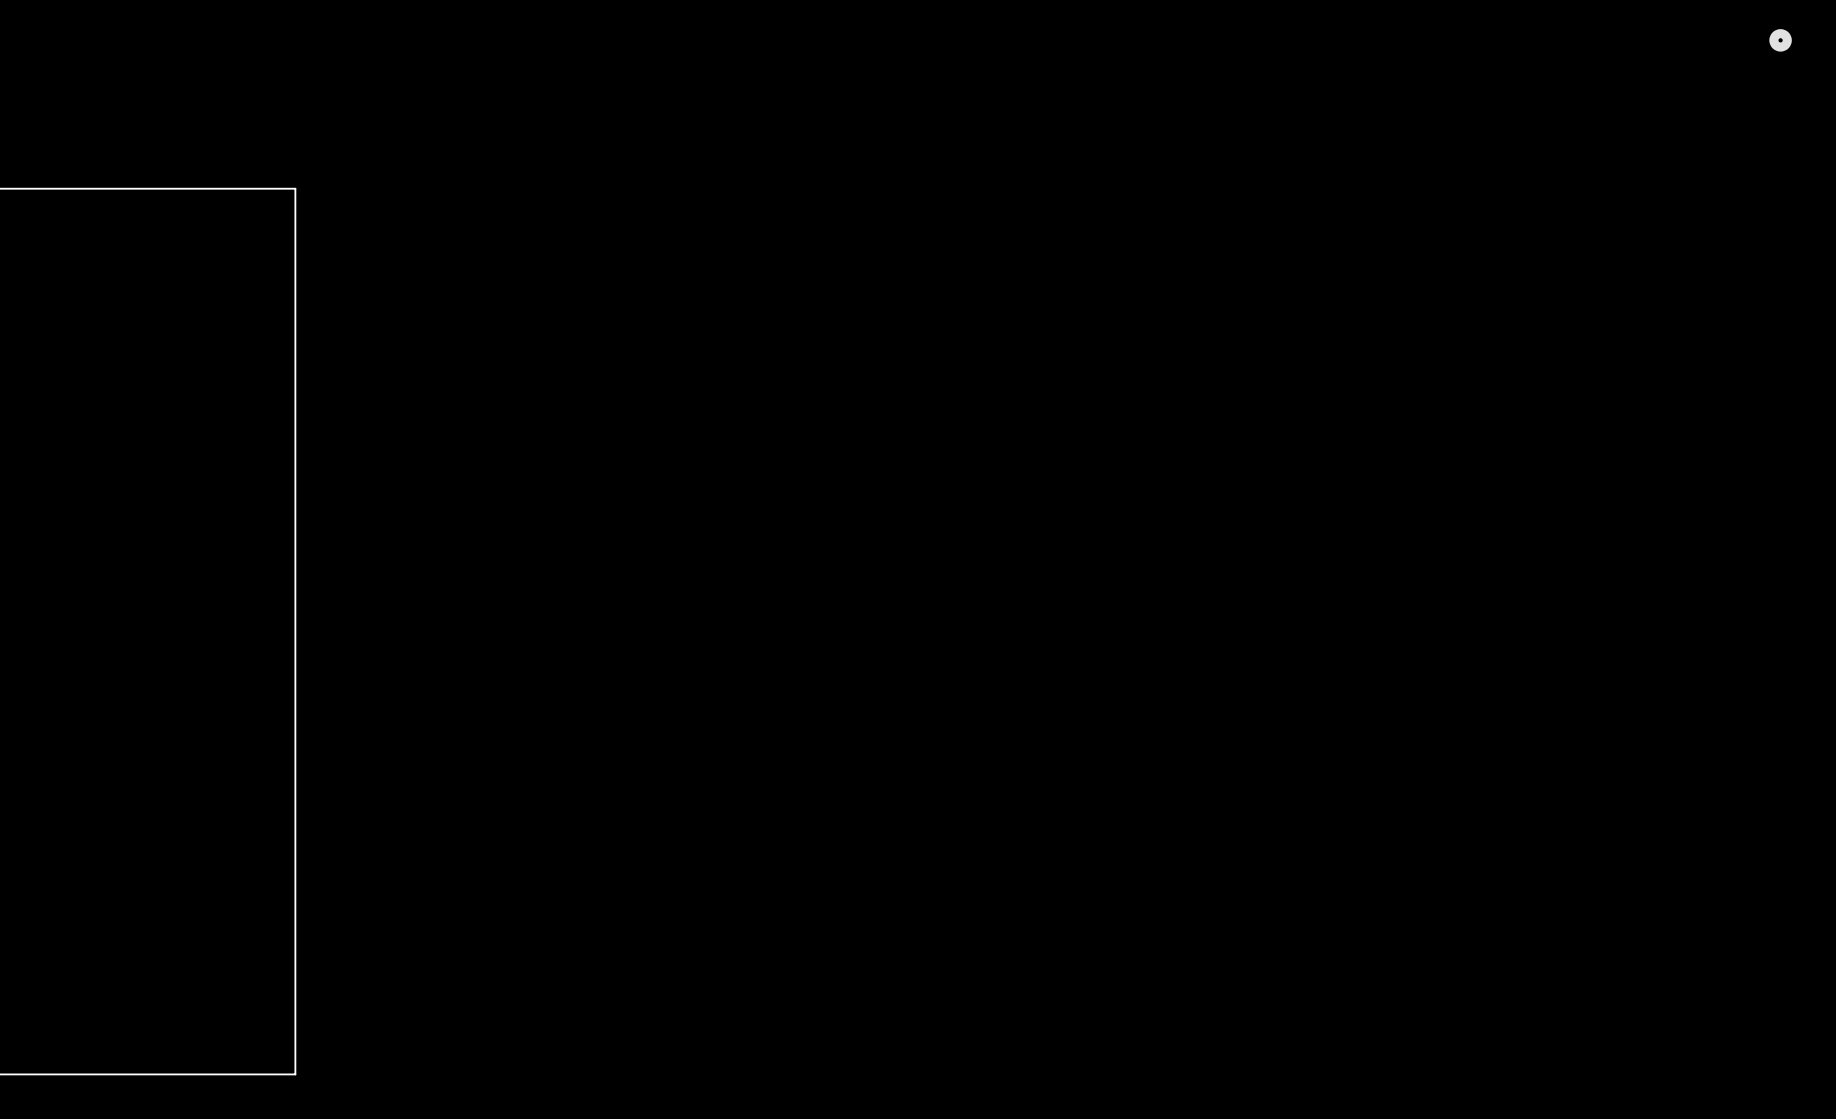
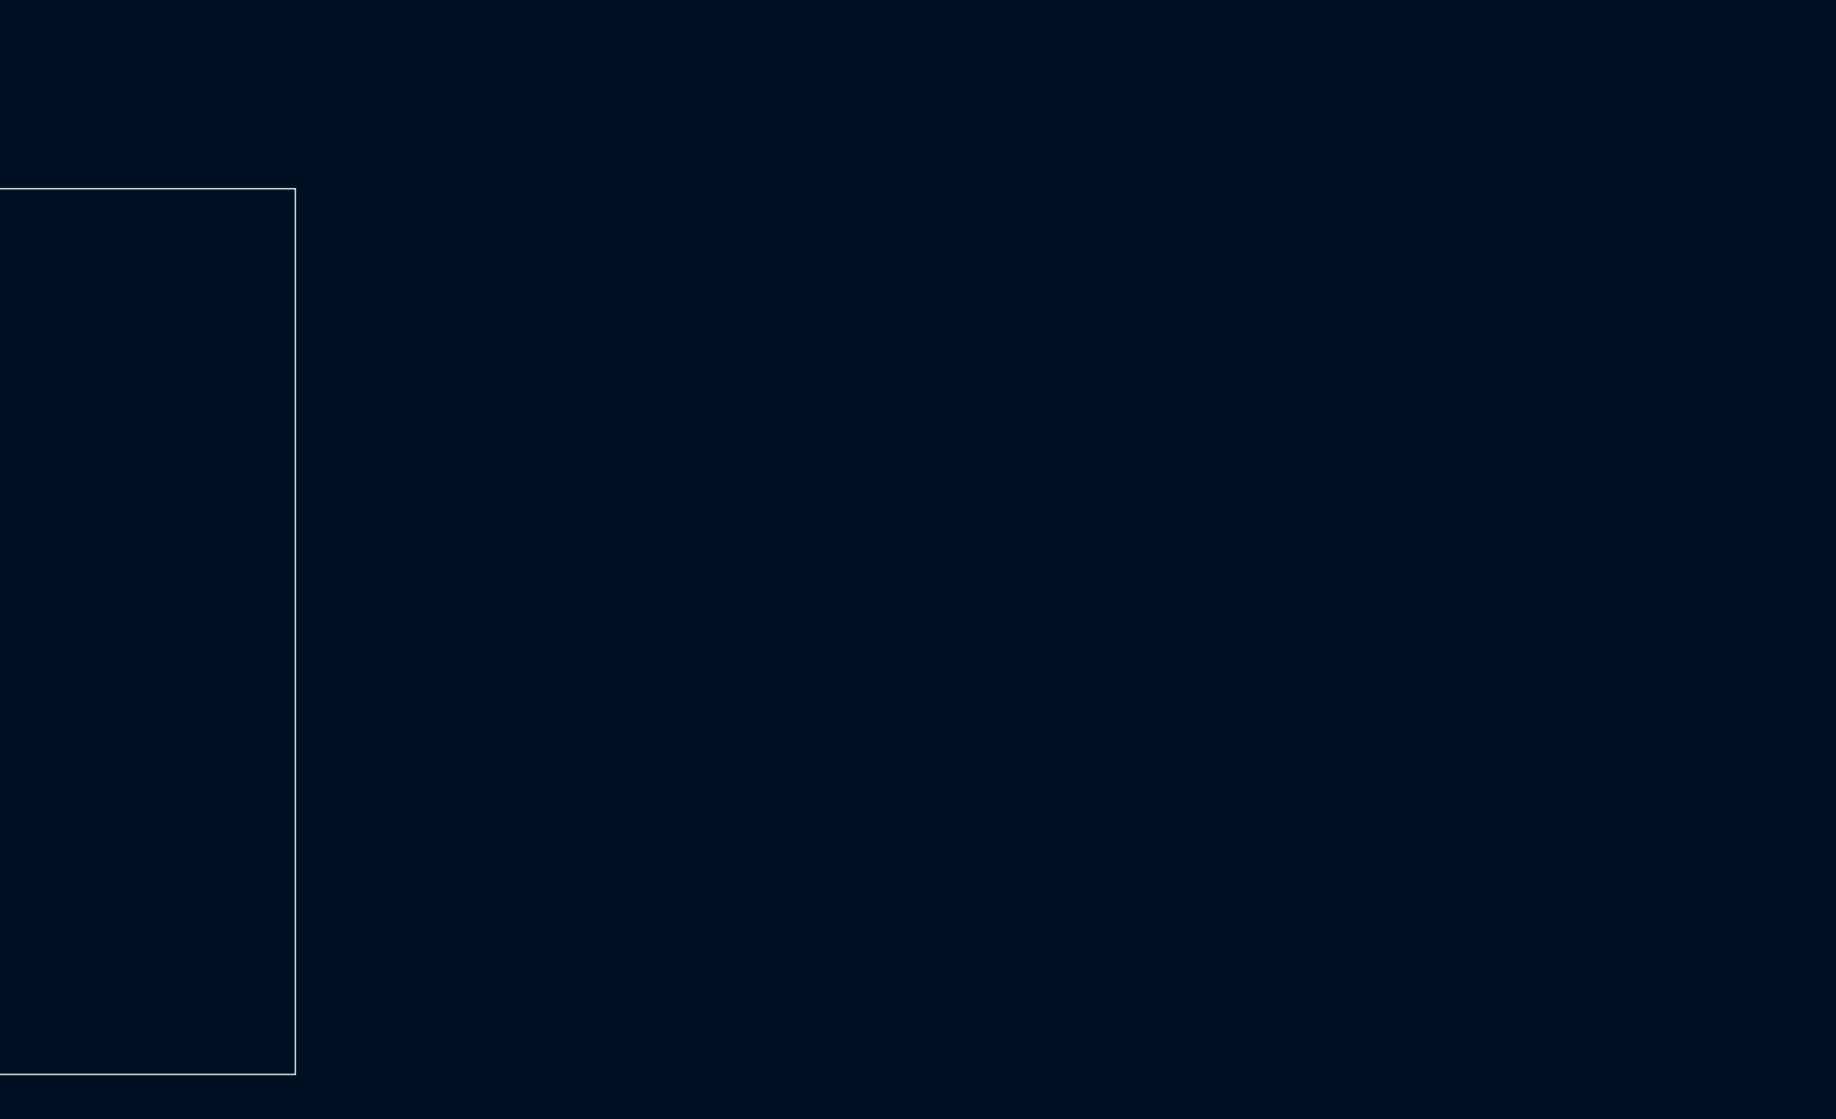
part: (1780, 40) -> none

